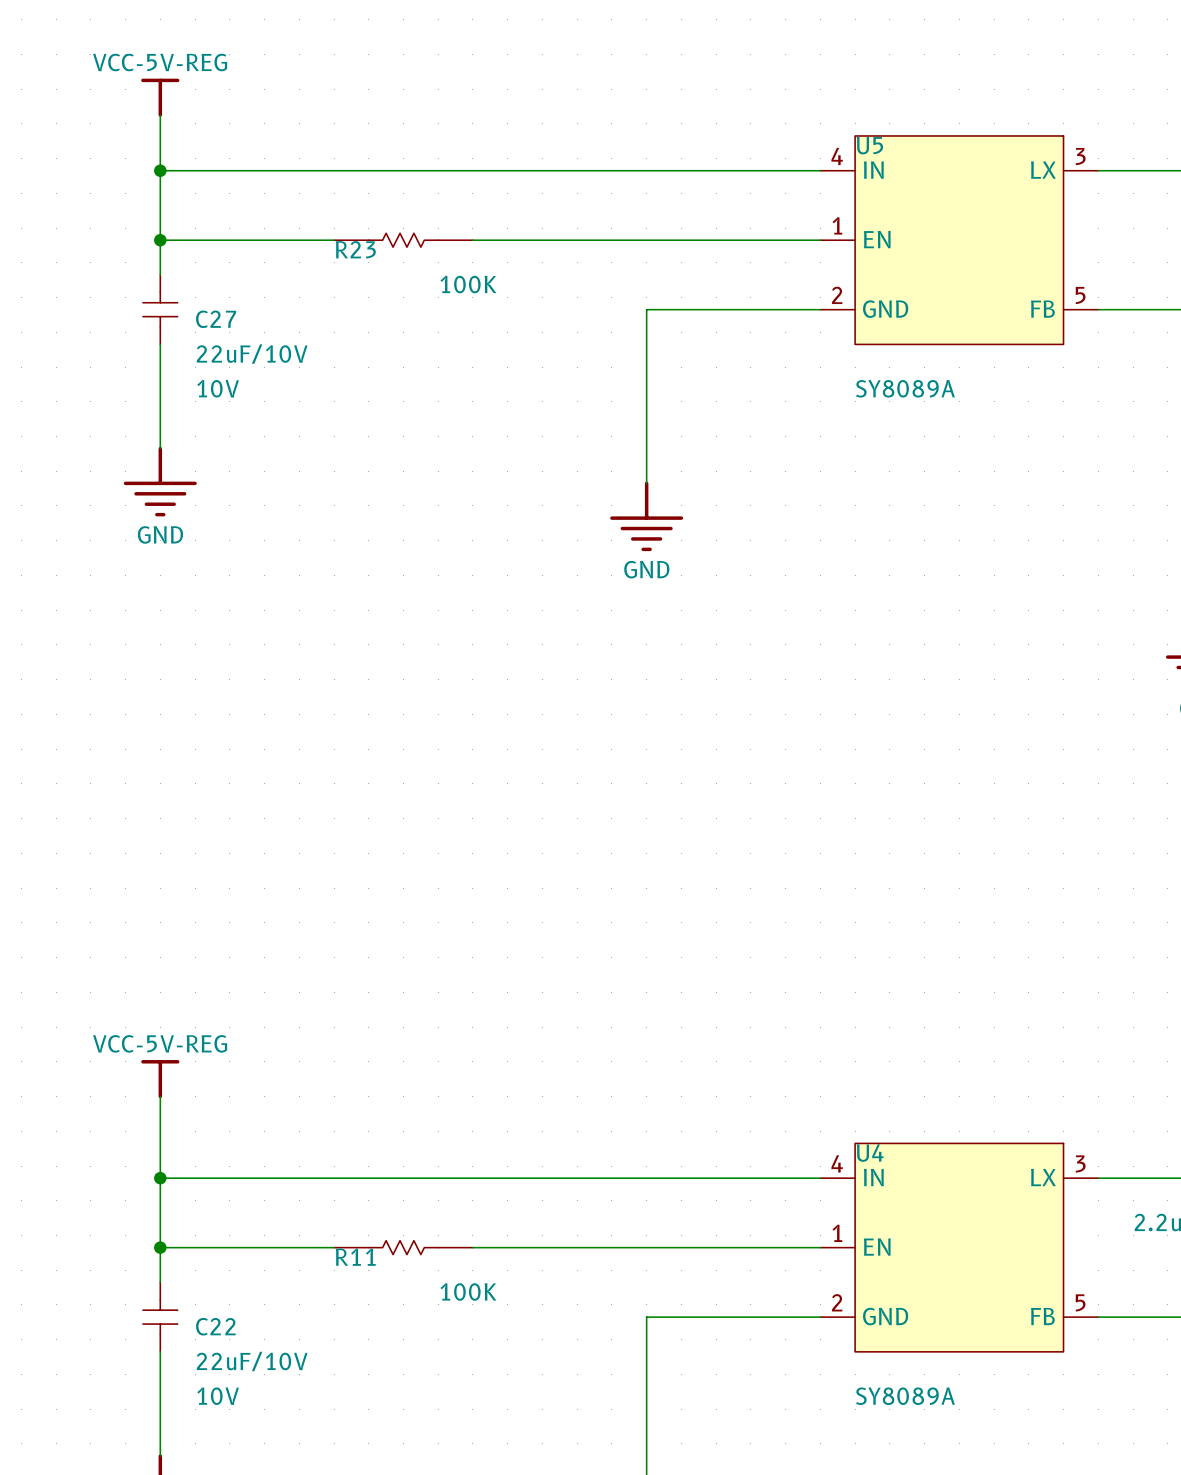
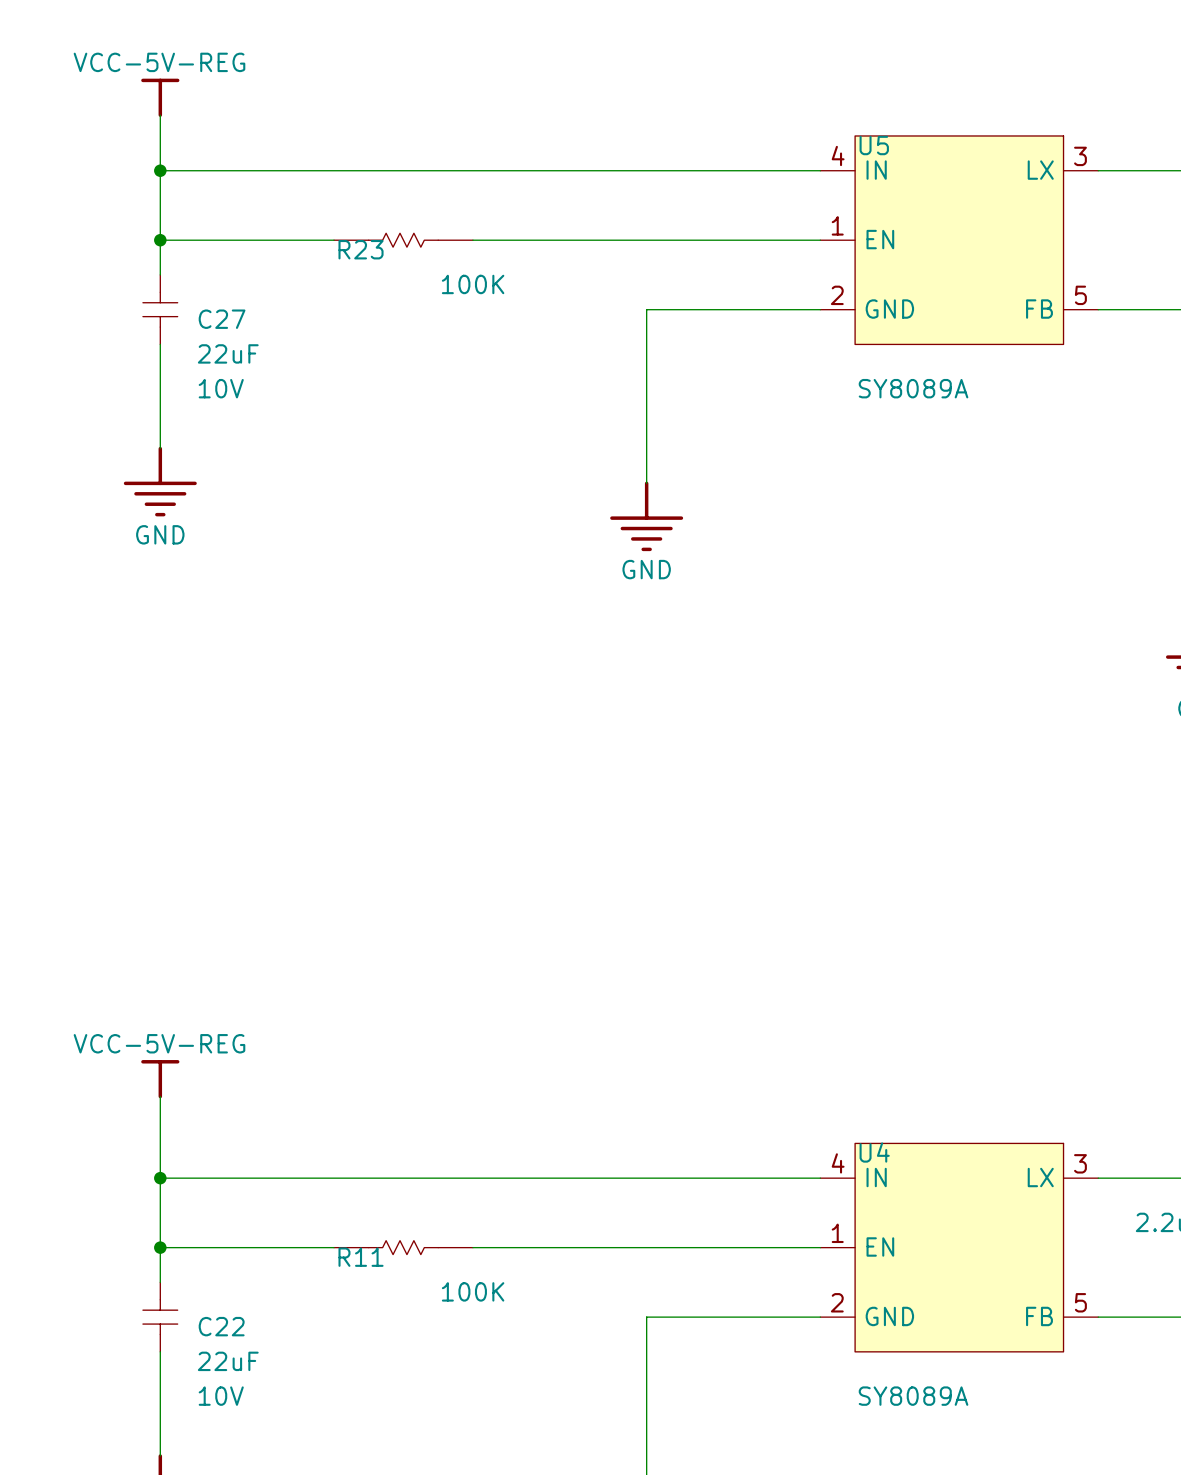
C27 value: 22uF/10V (252, 354) -> 22uF (228, 353)
C22 value: 22uF/10V (252, 1361) -> 22uF (228, 1361)

